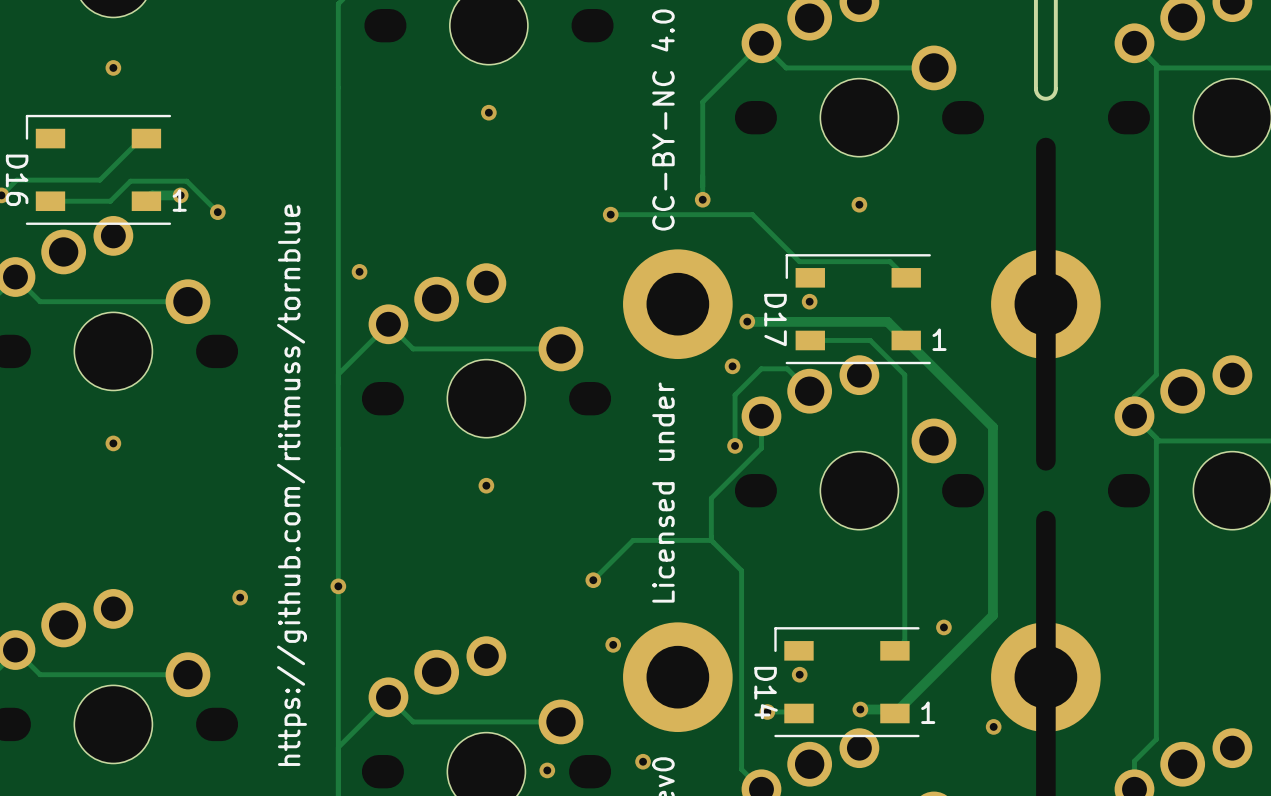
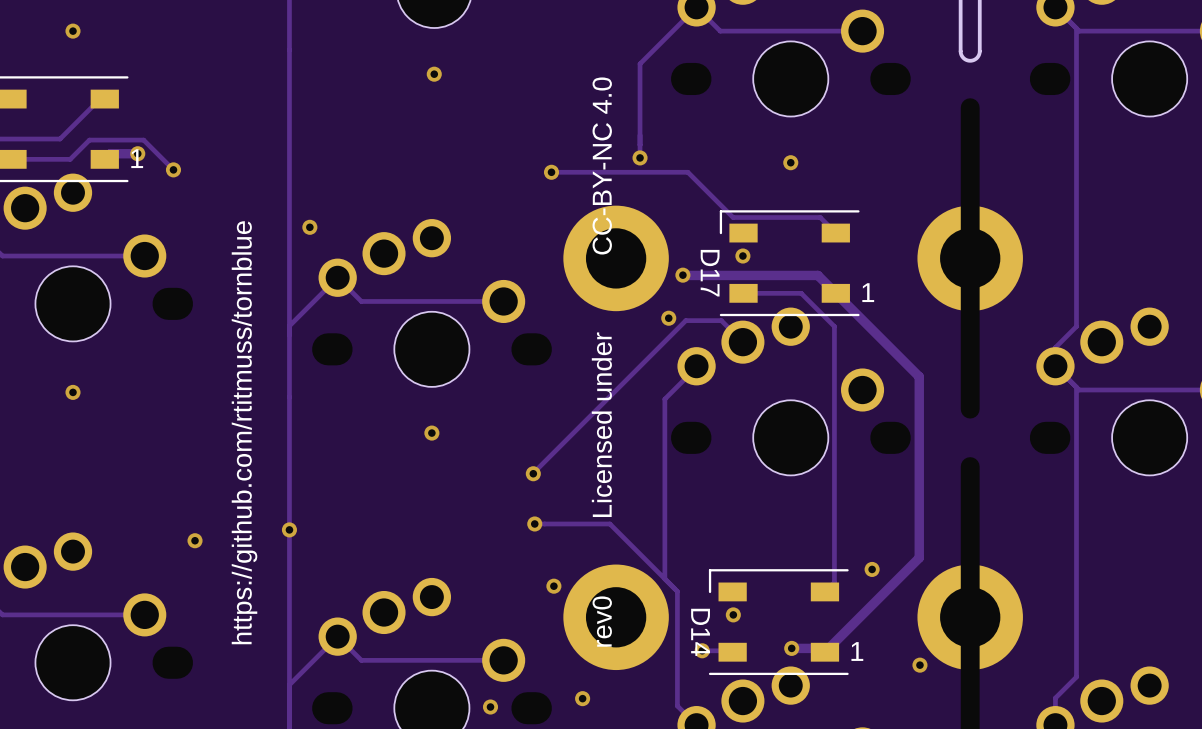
track: (761, 368) (735, 395) (735, 445) -> (696, 320) (685, 320) (533, 473)
track: (761, 417) (761, 448) (711, 498) (711, 540) -> (696, 367) (664, 399) (664, 578)
via: (735, 445) -> none
via: none -> (533, 473)
track: (711, 540) (633, 540) (593, 580) -> (677, 591) (609, 523) (534, 523)
track: (711, 540) (741, 570) (741, 650) -> none

